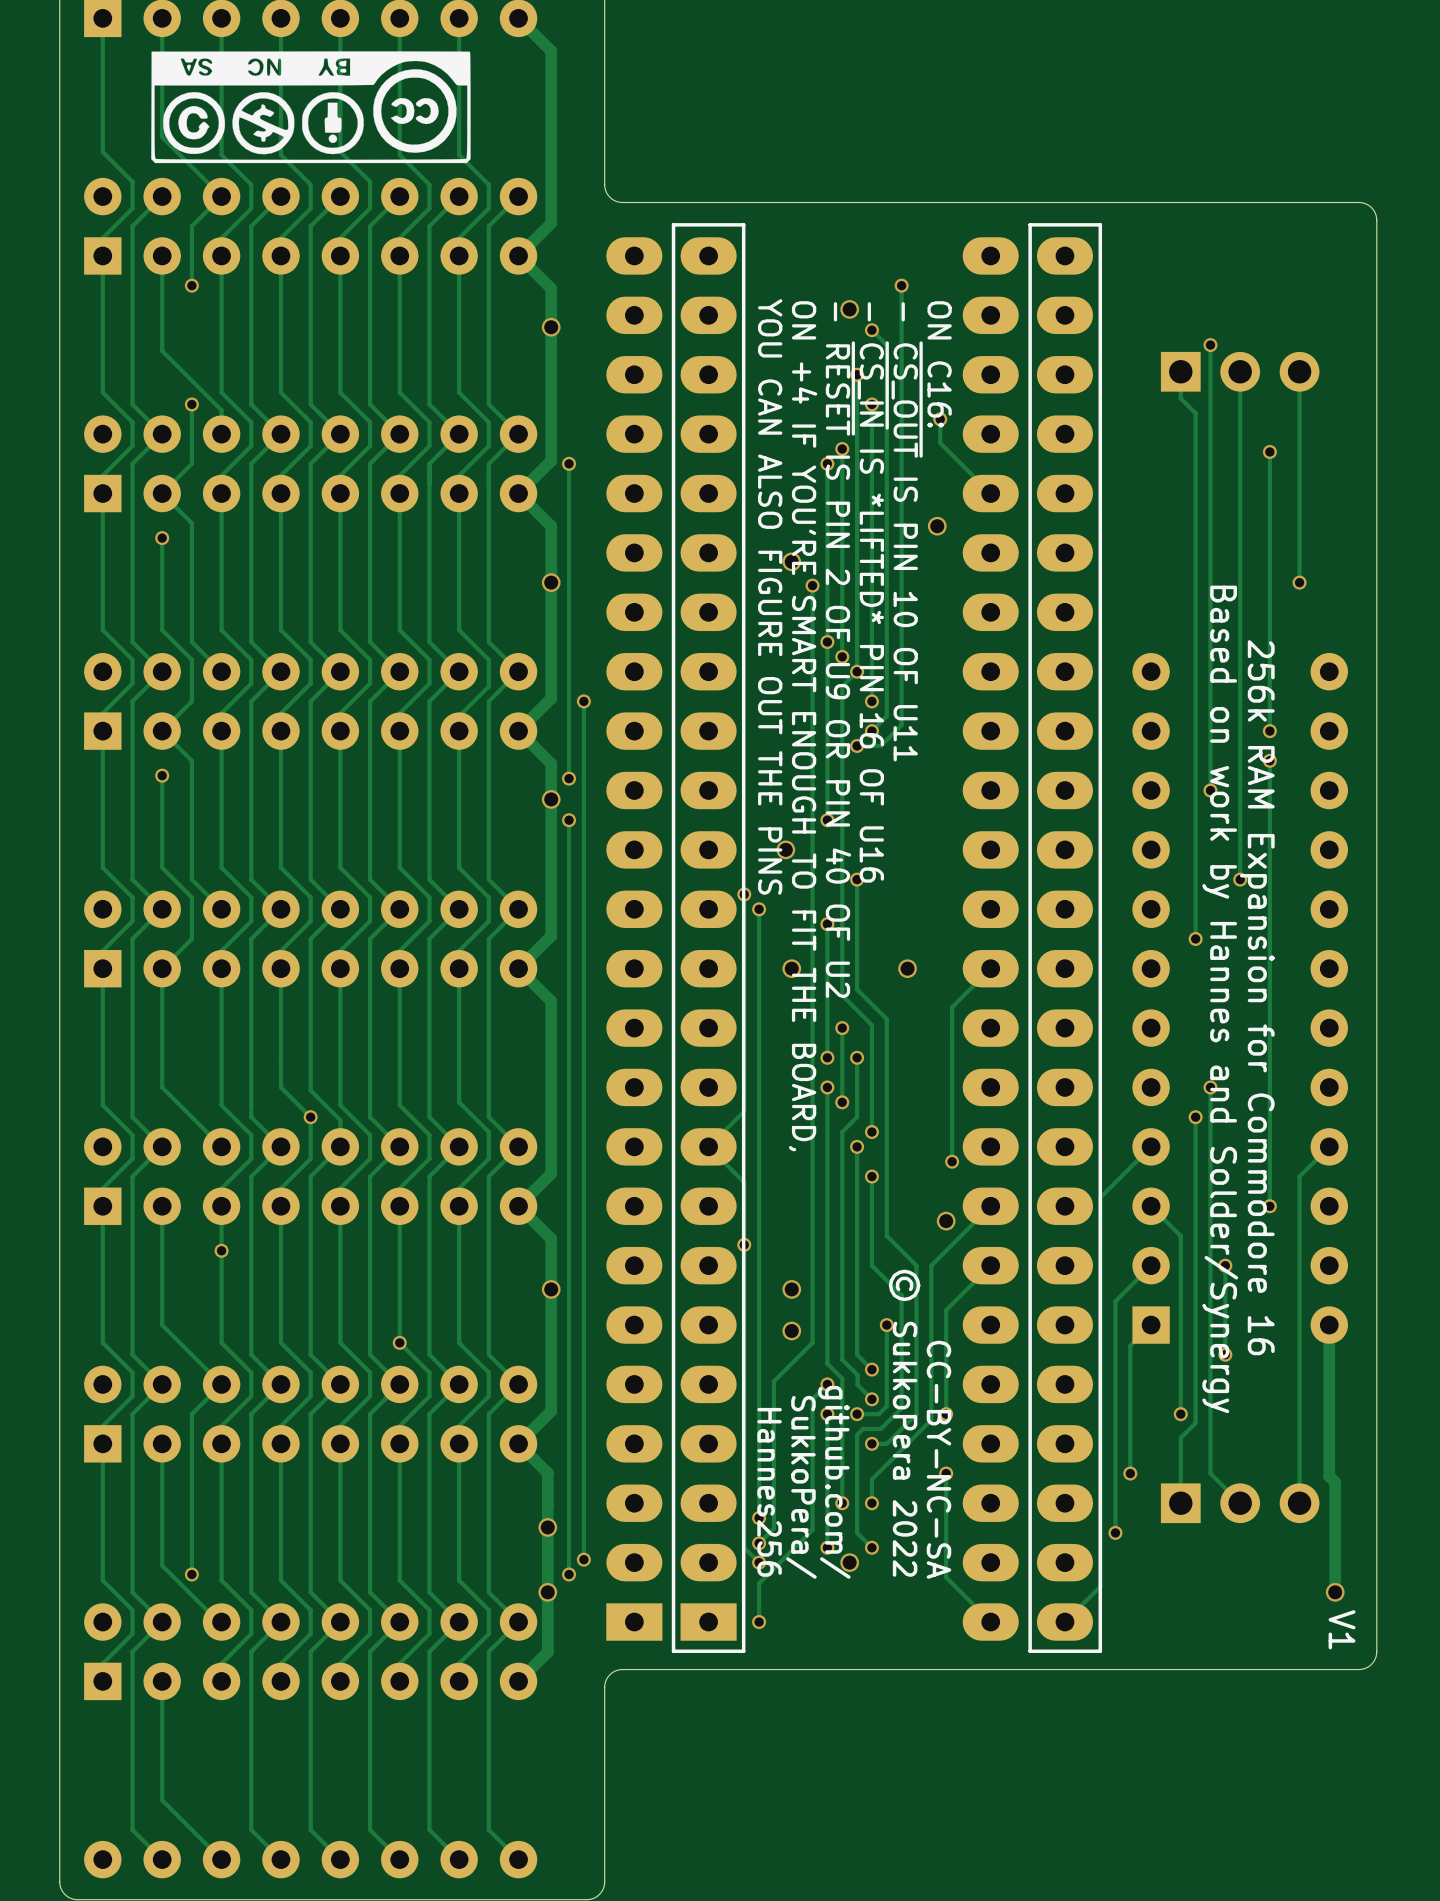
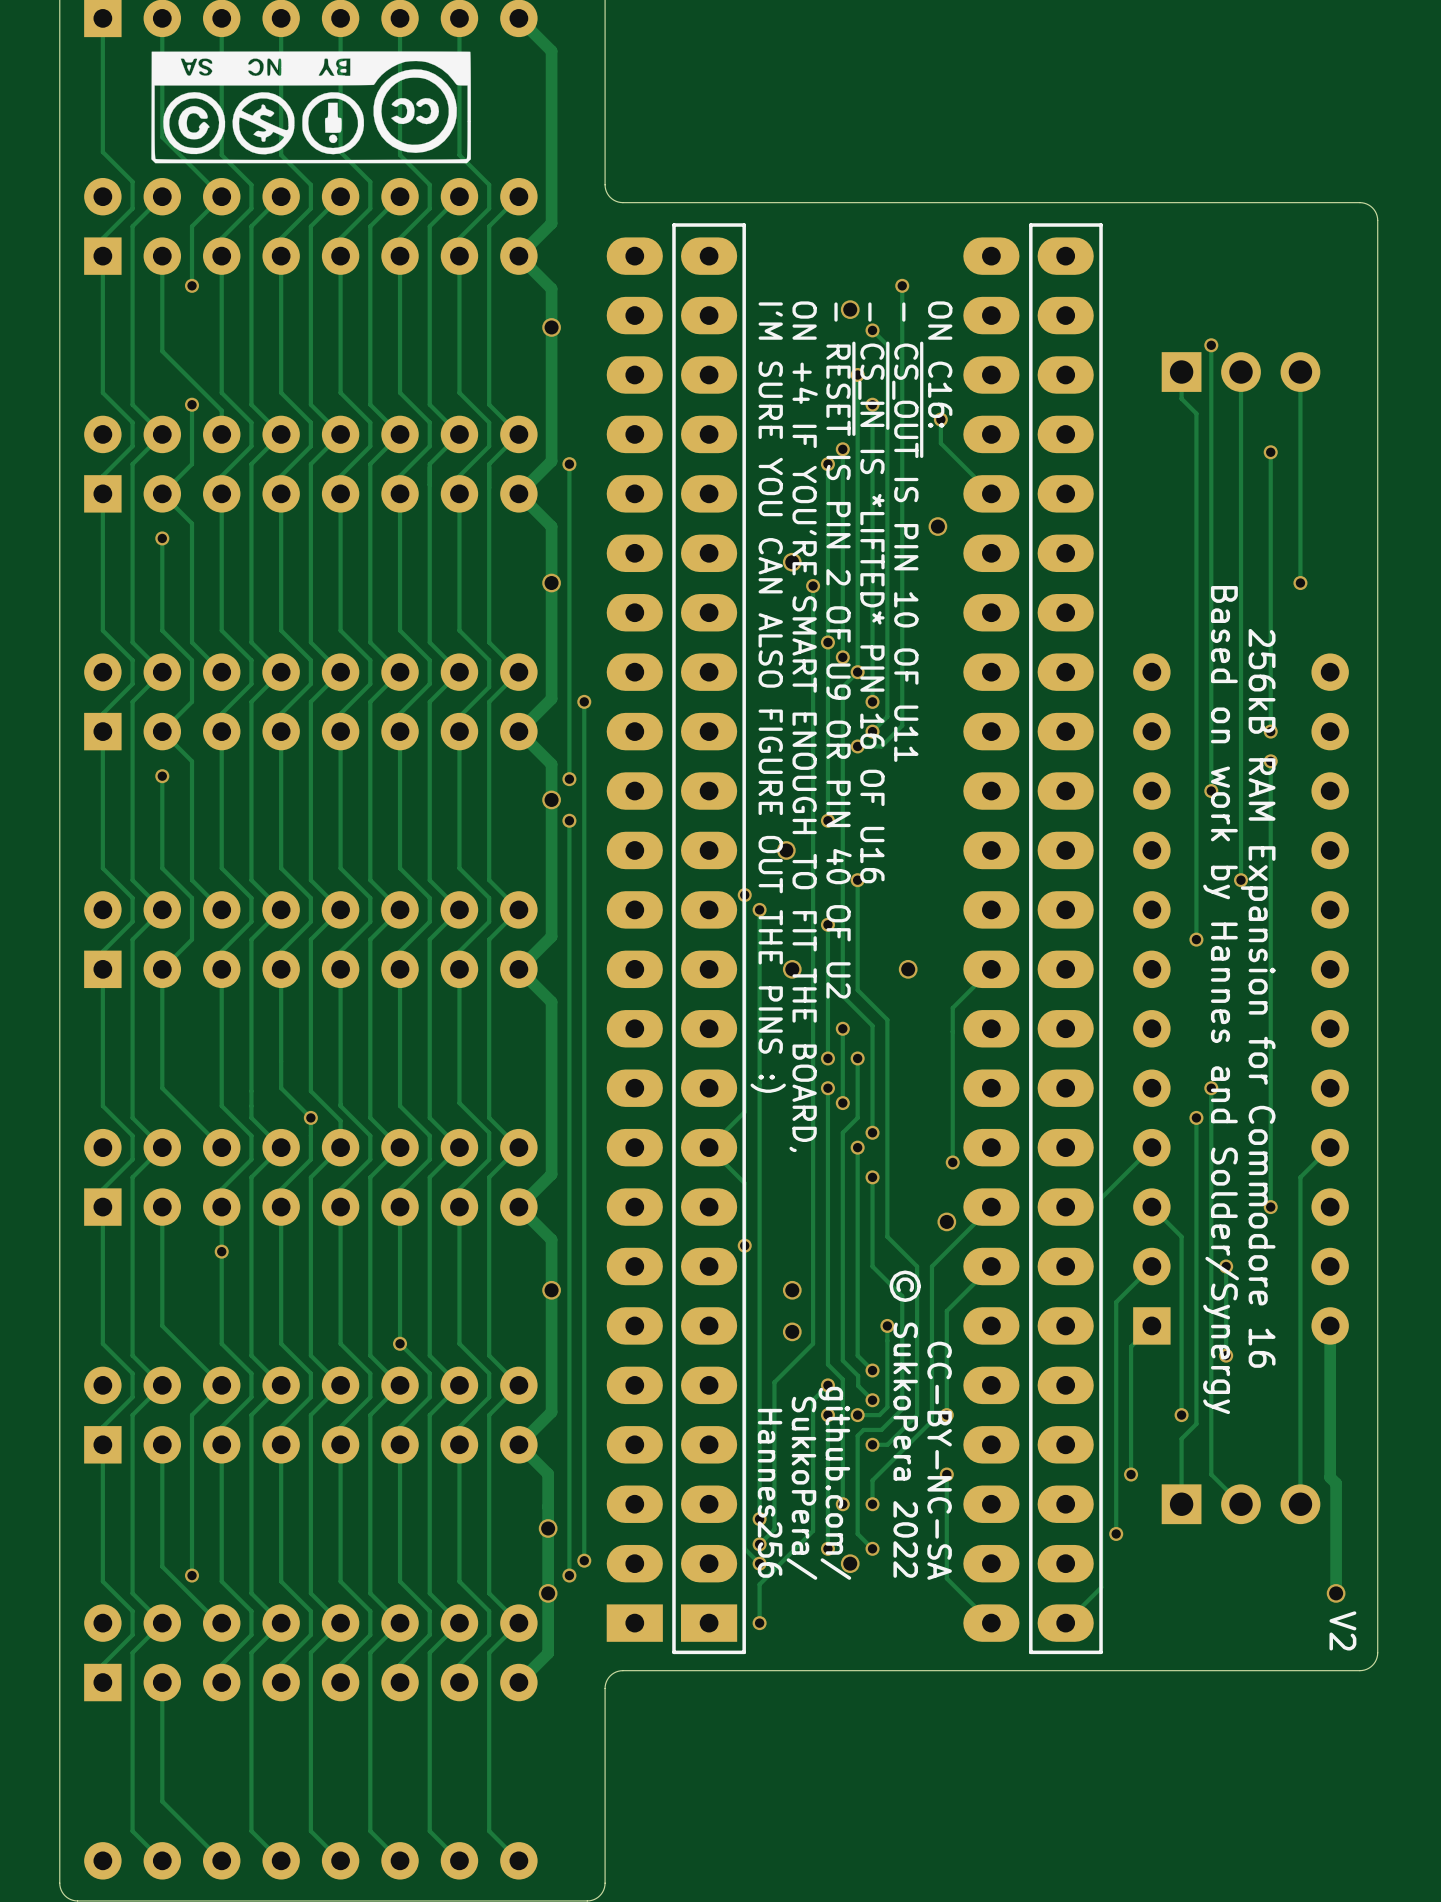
text: YOU CAN ALSO FIGURE OUT THE PINS (770, 596) -> I'M SURE YOU CAN ALSO FIGURE OUT THE PINS :) (768, 697)
text: 256k RAM Expansion for Commodore 16 (1257, 997) -> 256kB RAM Expansion for Commodore 16 (1258, 998)
text: V1 (1342, 1629) -> V2 (1342, 1630)

